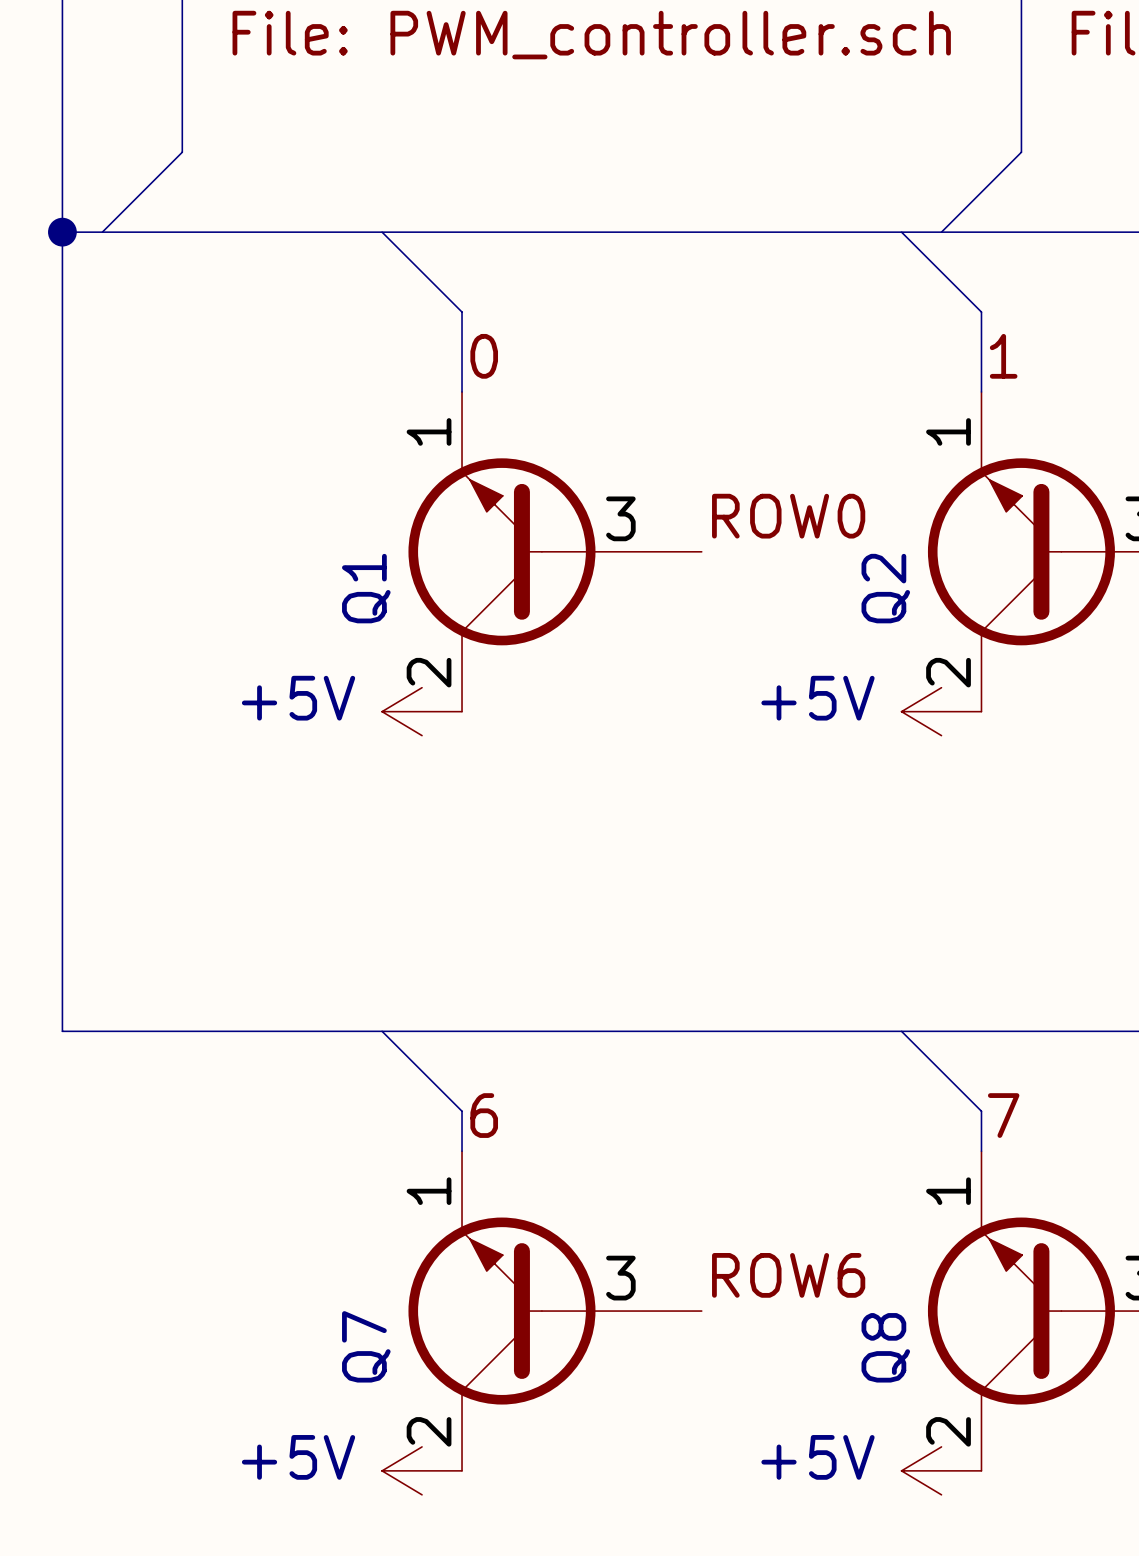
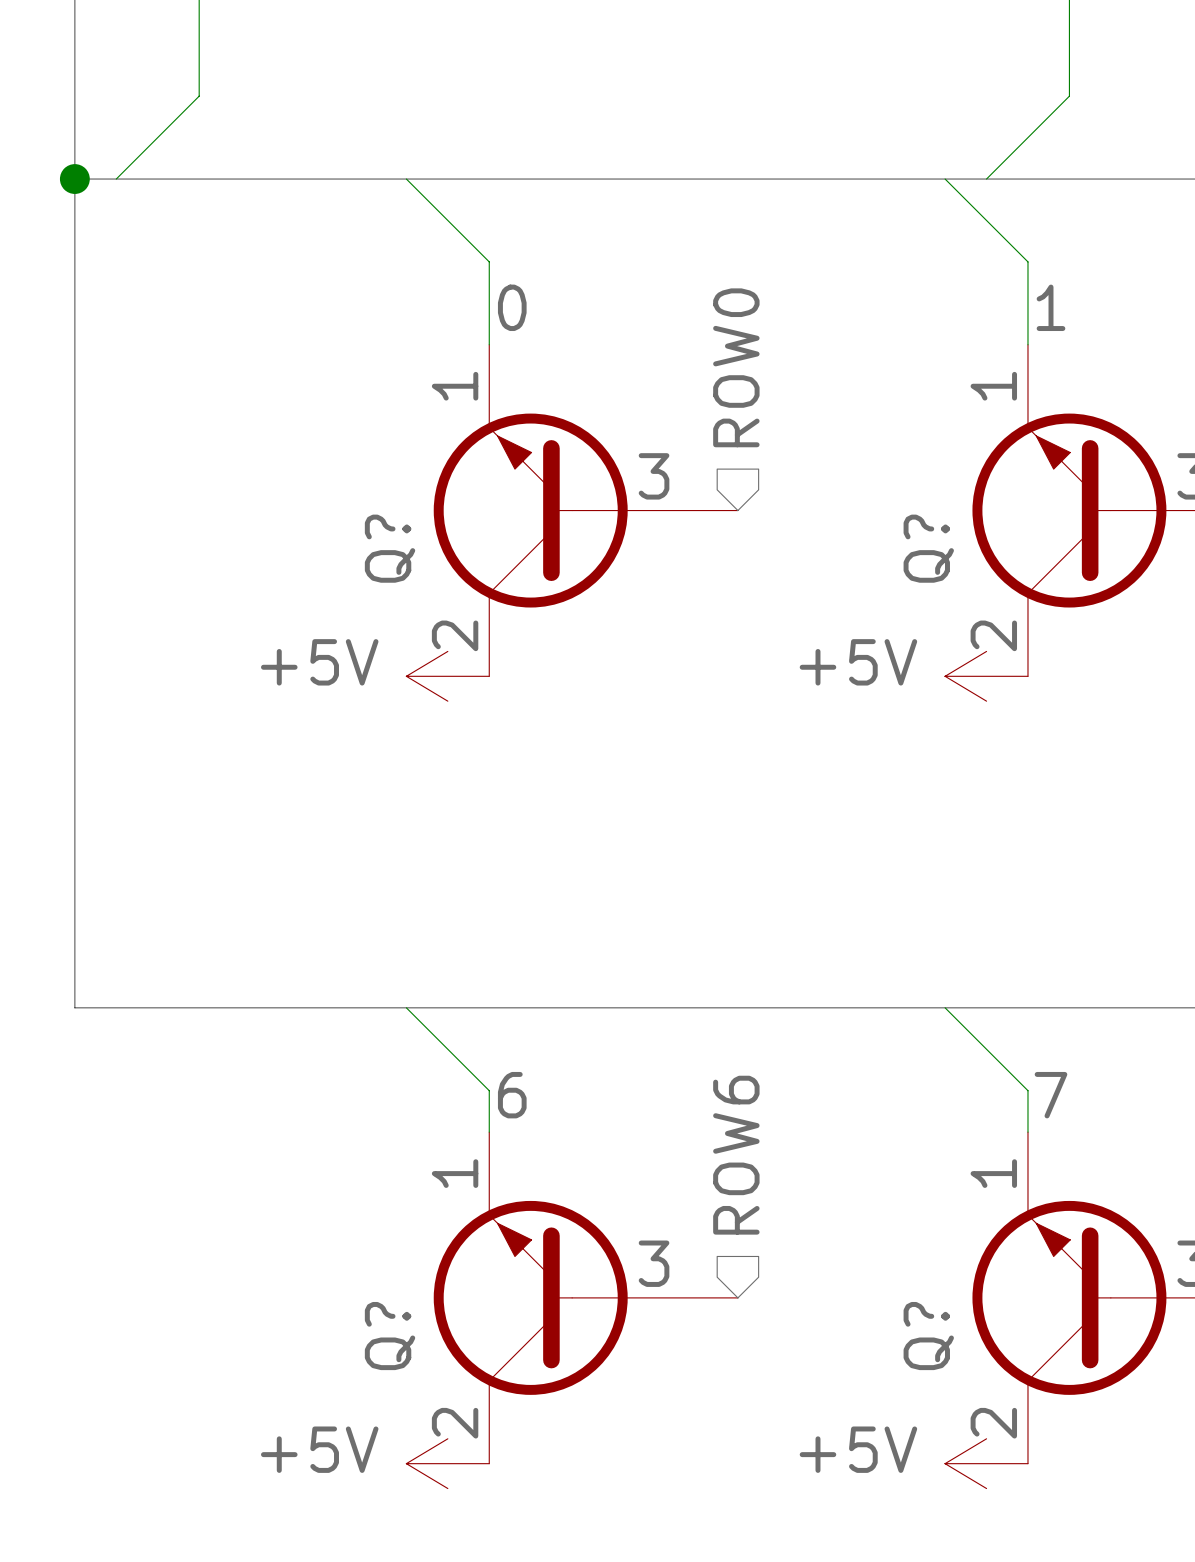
hierarchical label: none -> ROW0 (736, 367)
label: ROW0 (788, 516) -> none
Q1 name: Q1 (366, 588) -> Q? (390, 548)
Q2 name: Q2 (885, 588) -> Q? (928, 548)
hierarchical label: none -> ROW6 (736, 1155)
label: ROW6 (788, 1275) -> none
Q7 name: Q7 (366, 1346) -> Q? (390, 1336)
Q8 name: Q8 (885, 1347) -> Q? (928, 1336)

